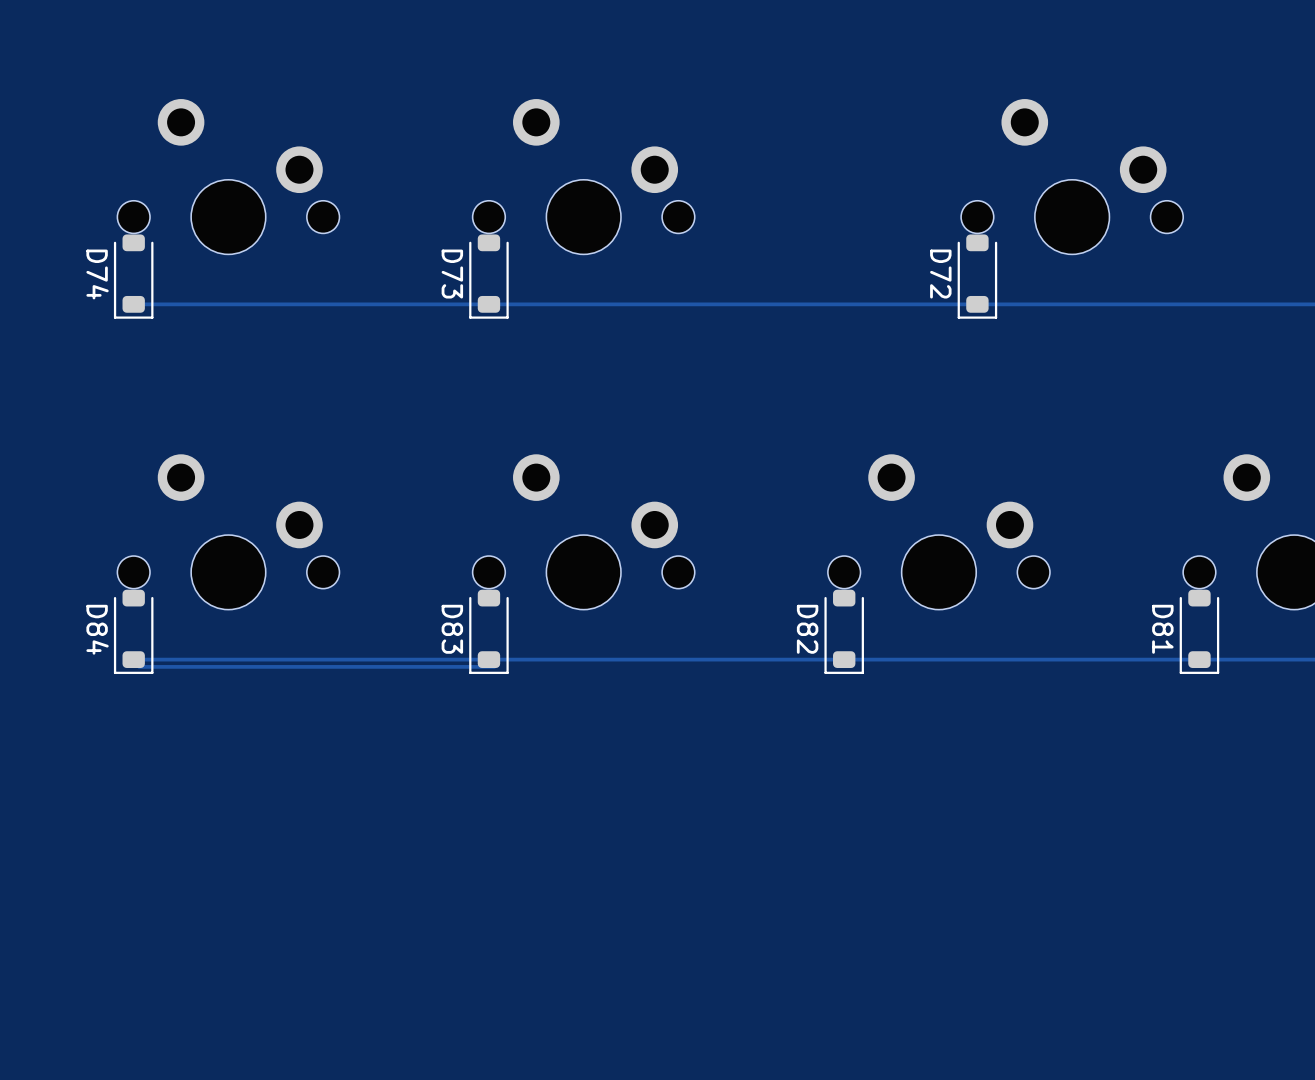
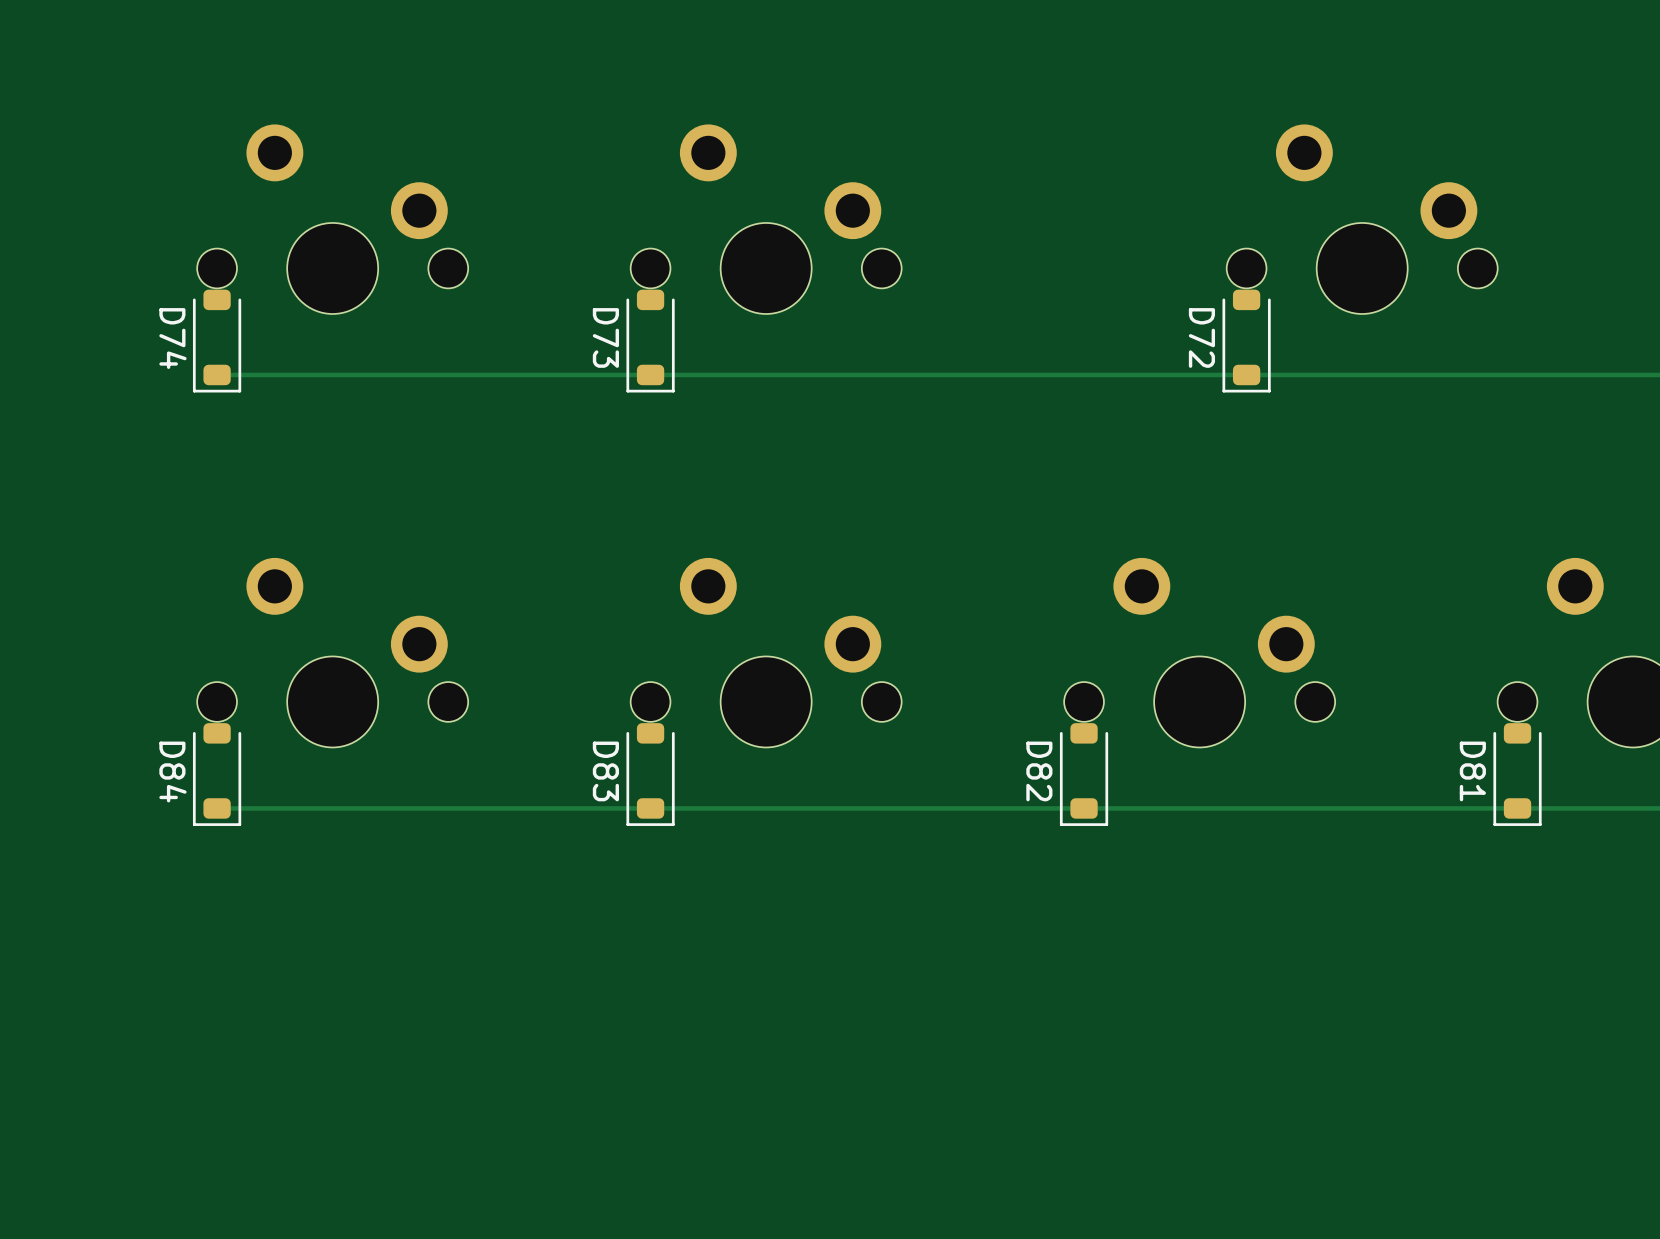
track: (494, 666) (139, 666) -> none

